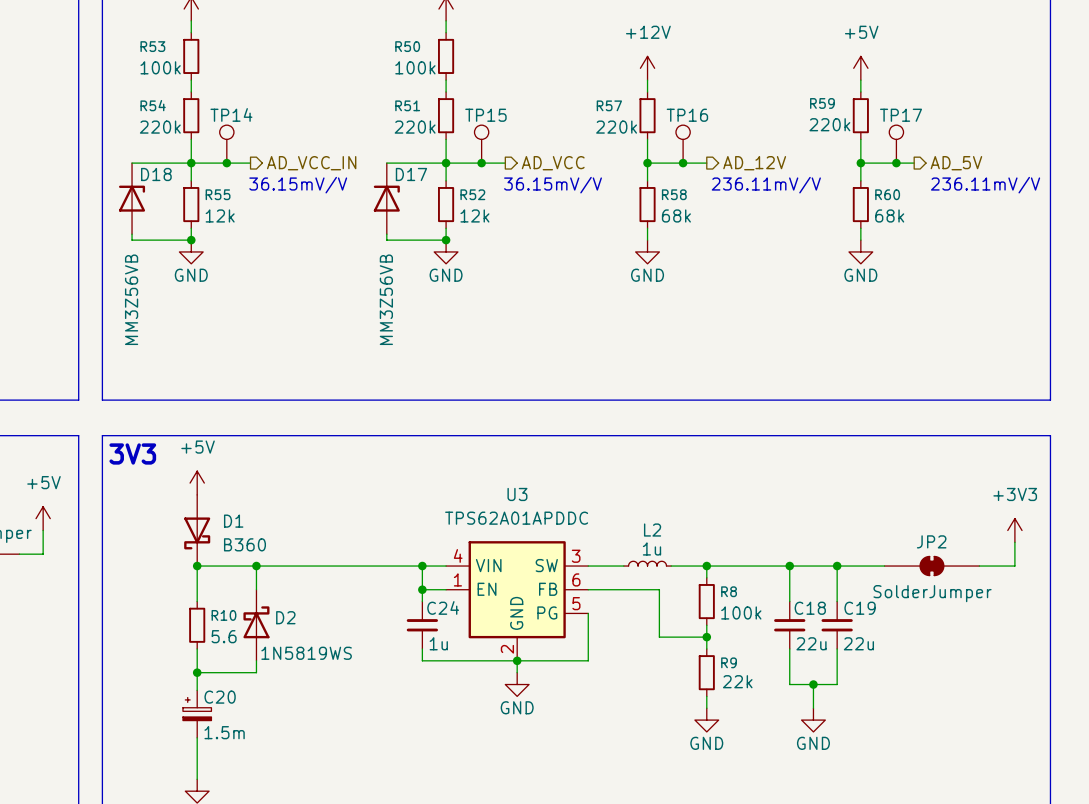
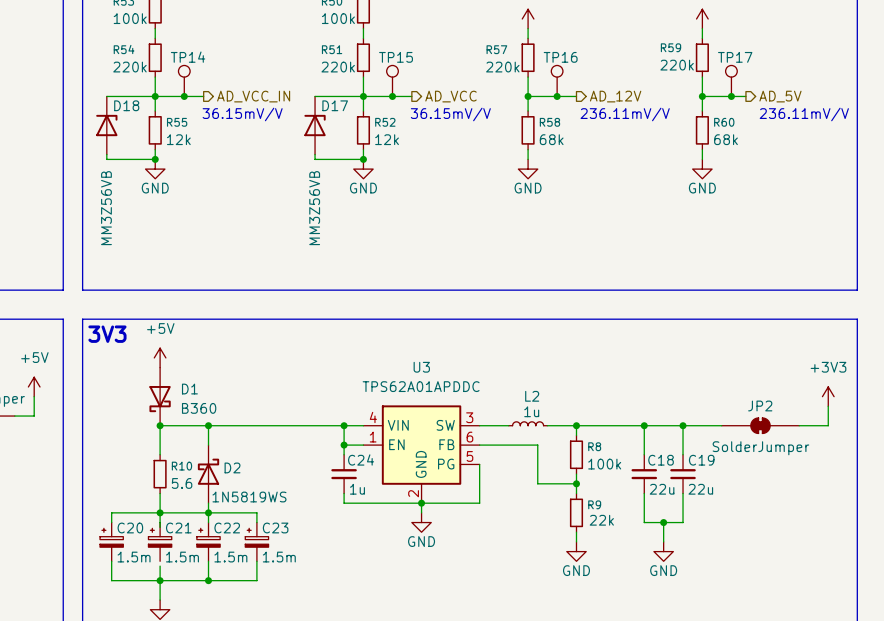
wire: none -> (160, 512) (111, 512) (111, 522)
junction: none -> (208, 512)
wire: none -> (208, 522) (208, 512) (256, 512) (256, 522)
C21: none -> 1.5m (160, 541)
C22: none -> 1.5m (208, 541)
C23: none -> 1.5m (256, 541)
C20 position: (197, 714) -> (111, 541)
wire: none -> (111, 561) (111, 580) (256, 580) (256, 561)
wire: none -> (208, 561) (208, 580)
junction: none -> (160, 580)
junction: none -> (208, 580)

